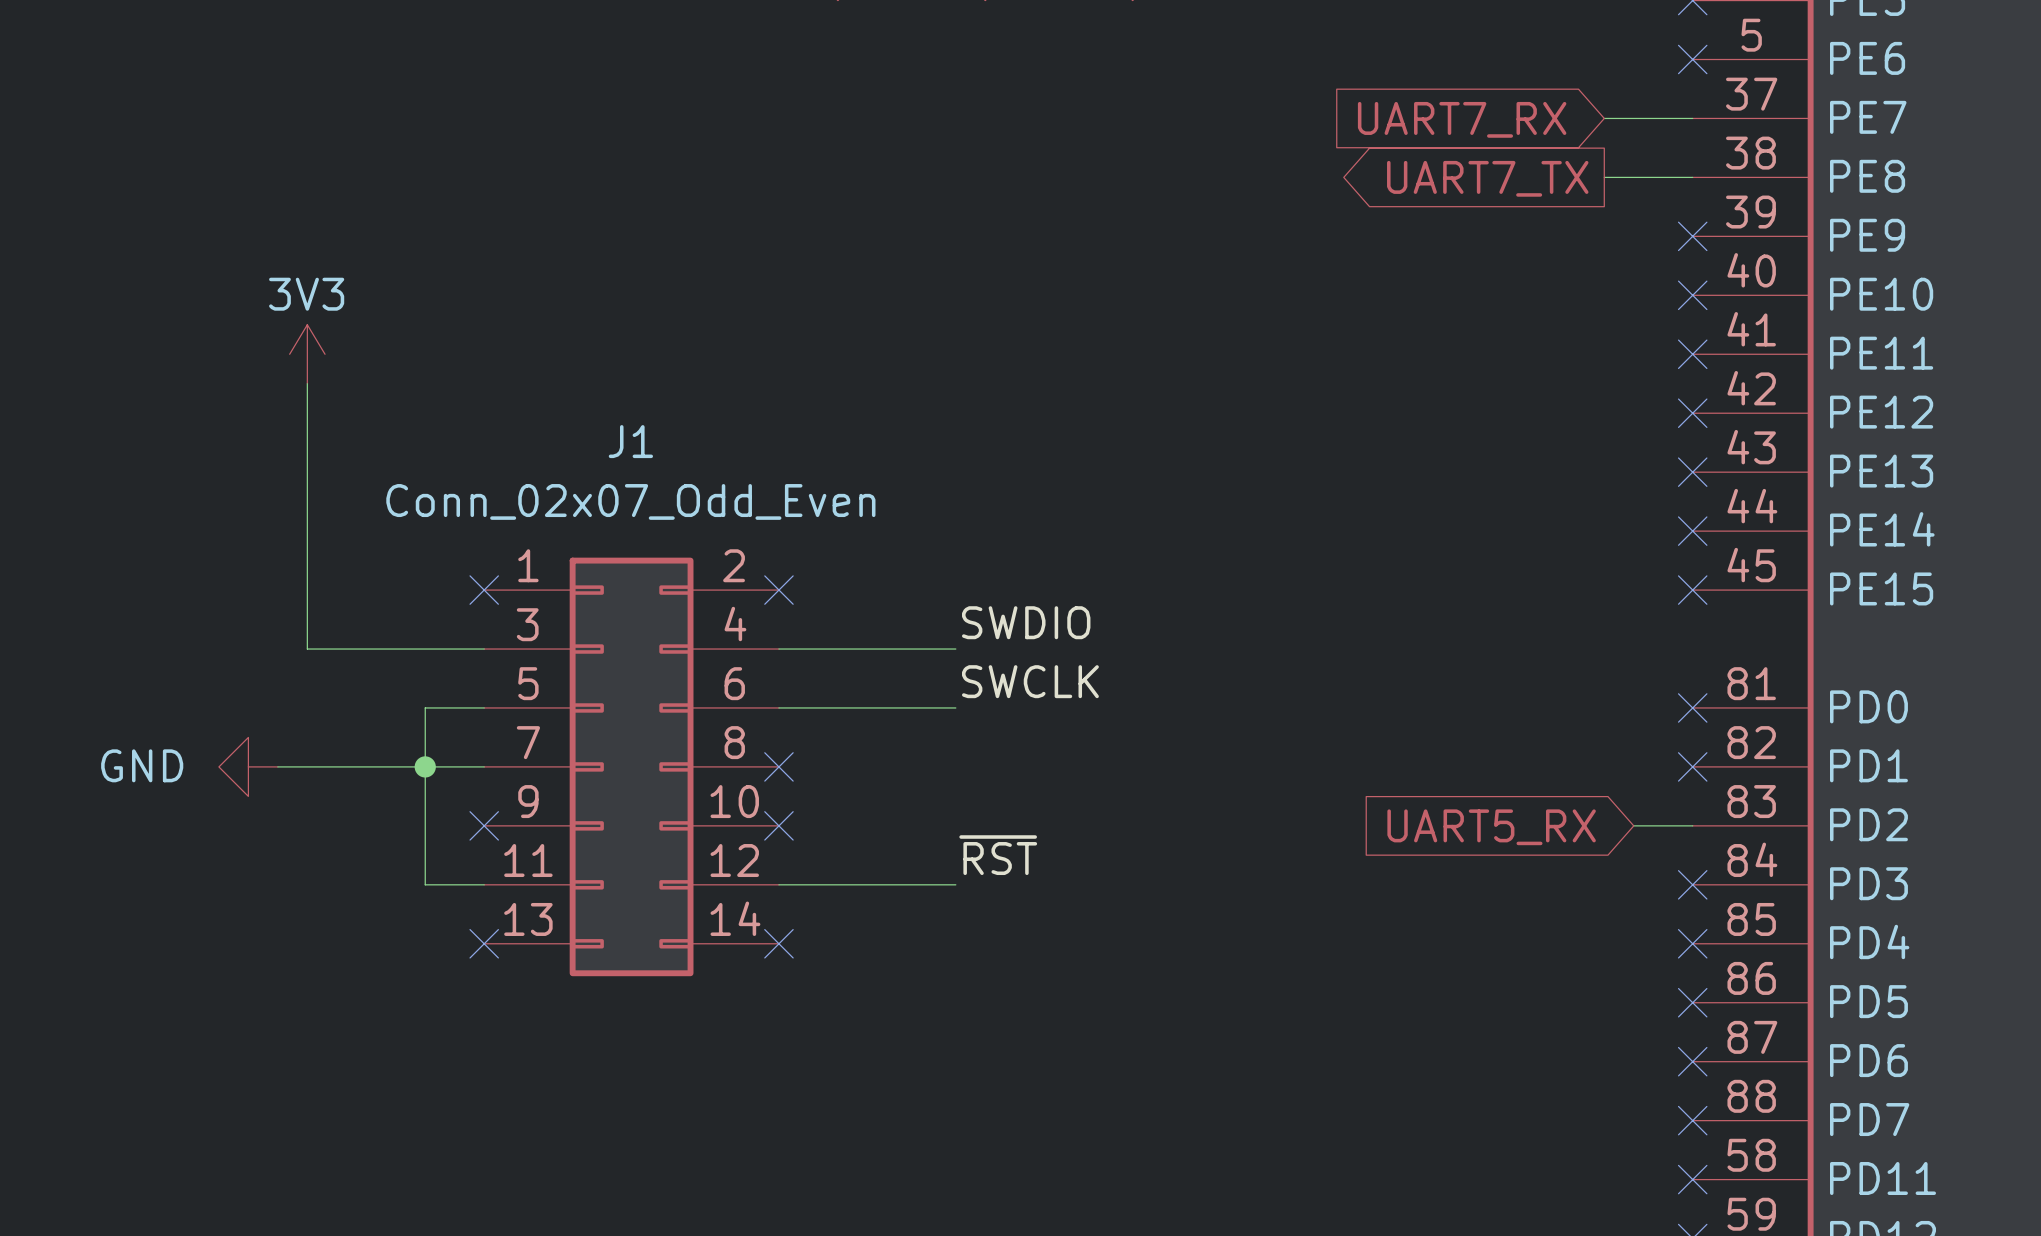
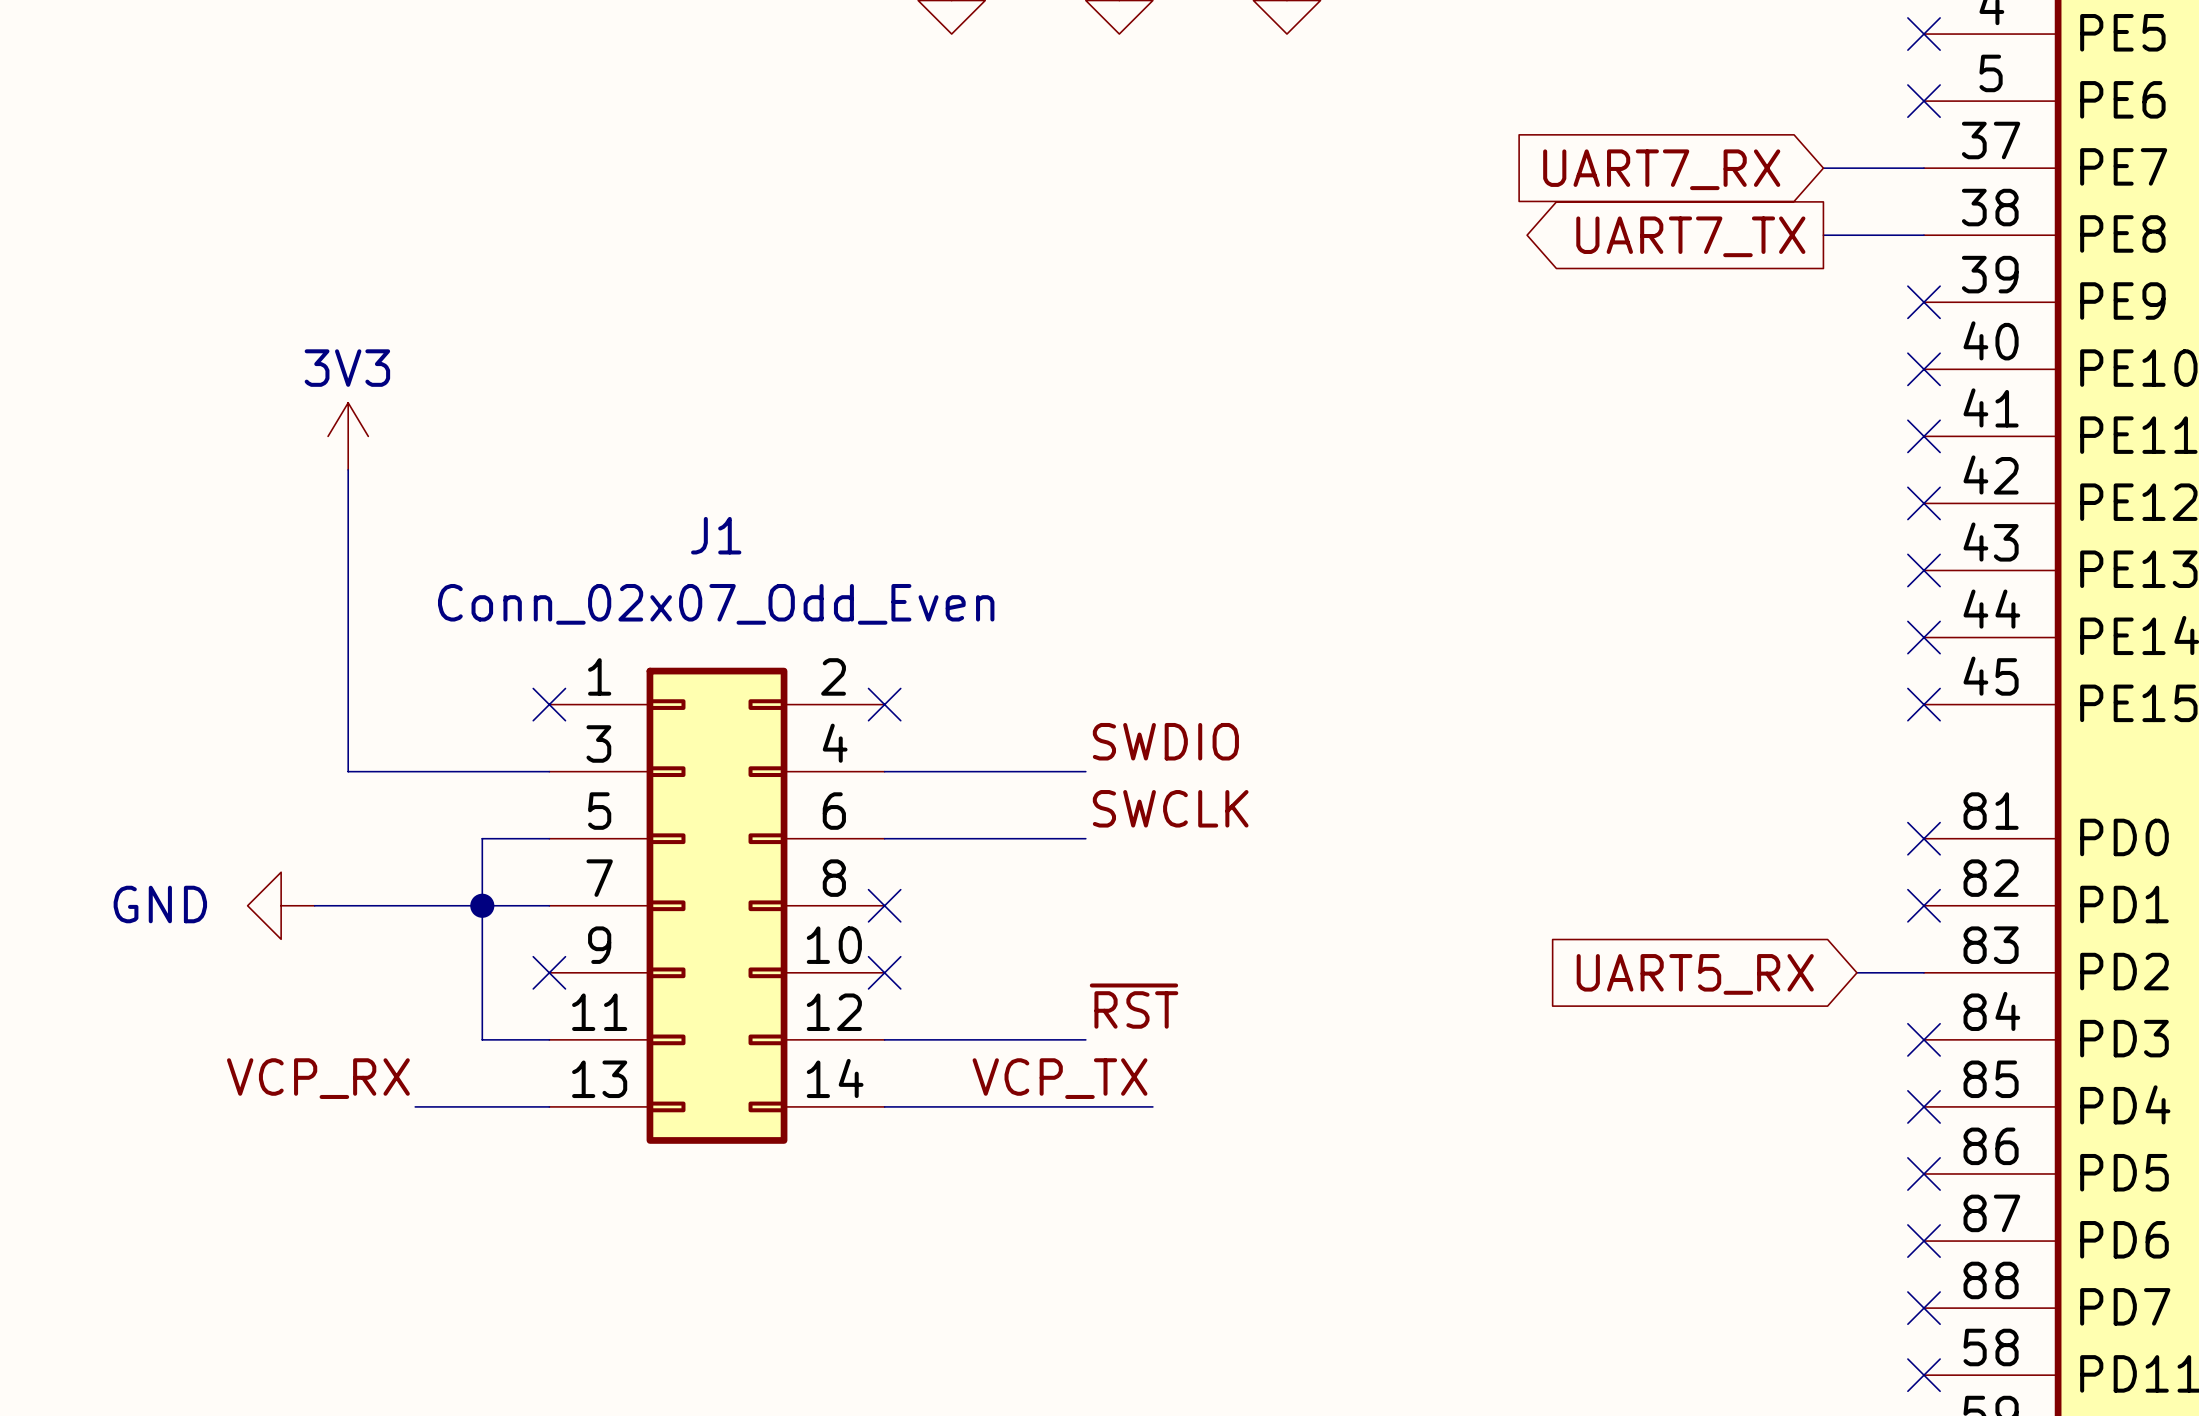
label: none -> VCP_RX (318, 1078)
label: none -> VCP_TX (1060, 1078)
wire: none -> (415, 1106) (549, 1106)
no-connect mark: (484, 943) -> none
wire: none -> (884, 1106) (1152, 1106)
no-connect mark: (778, 943) -> none

